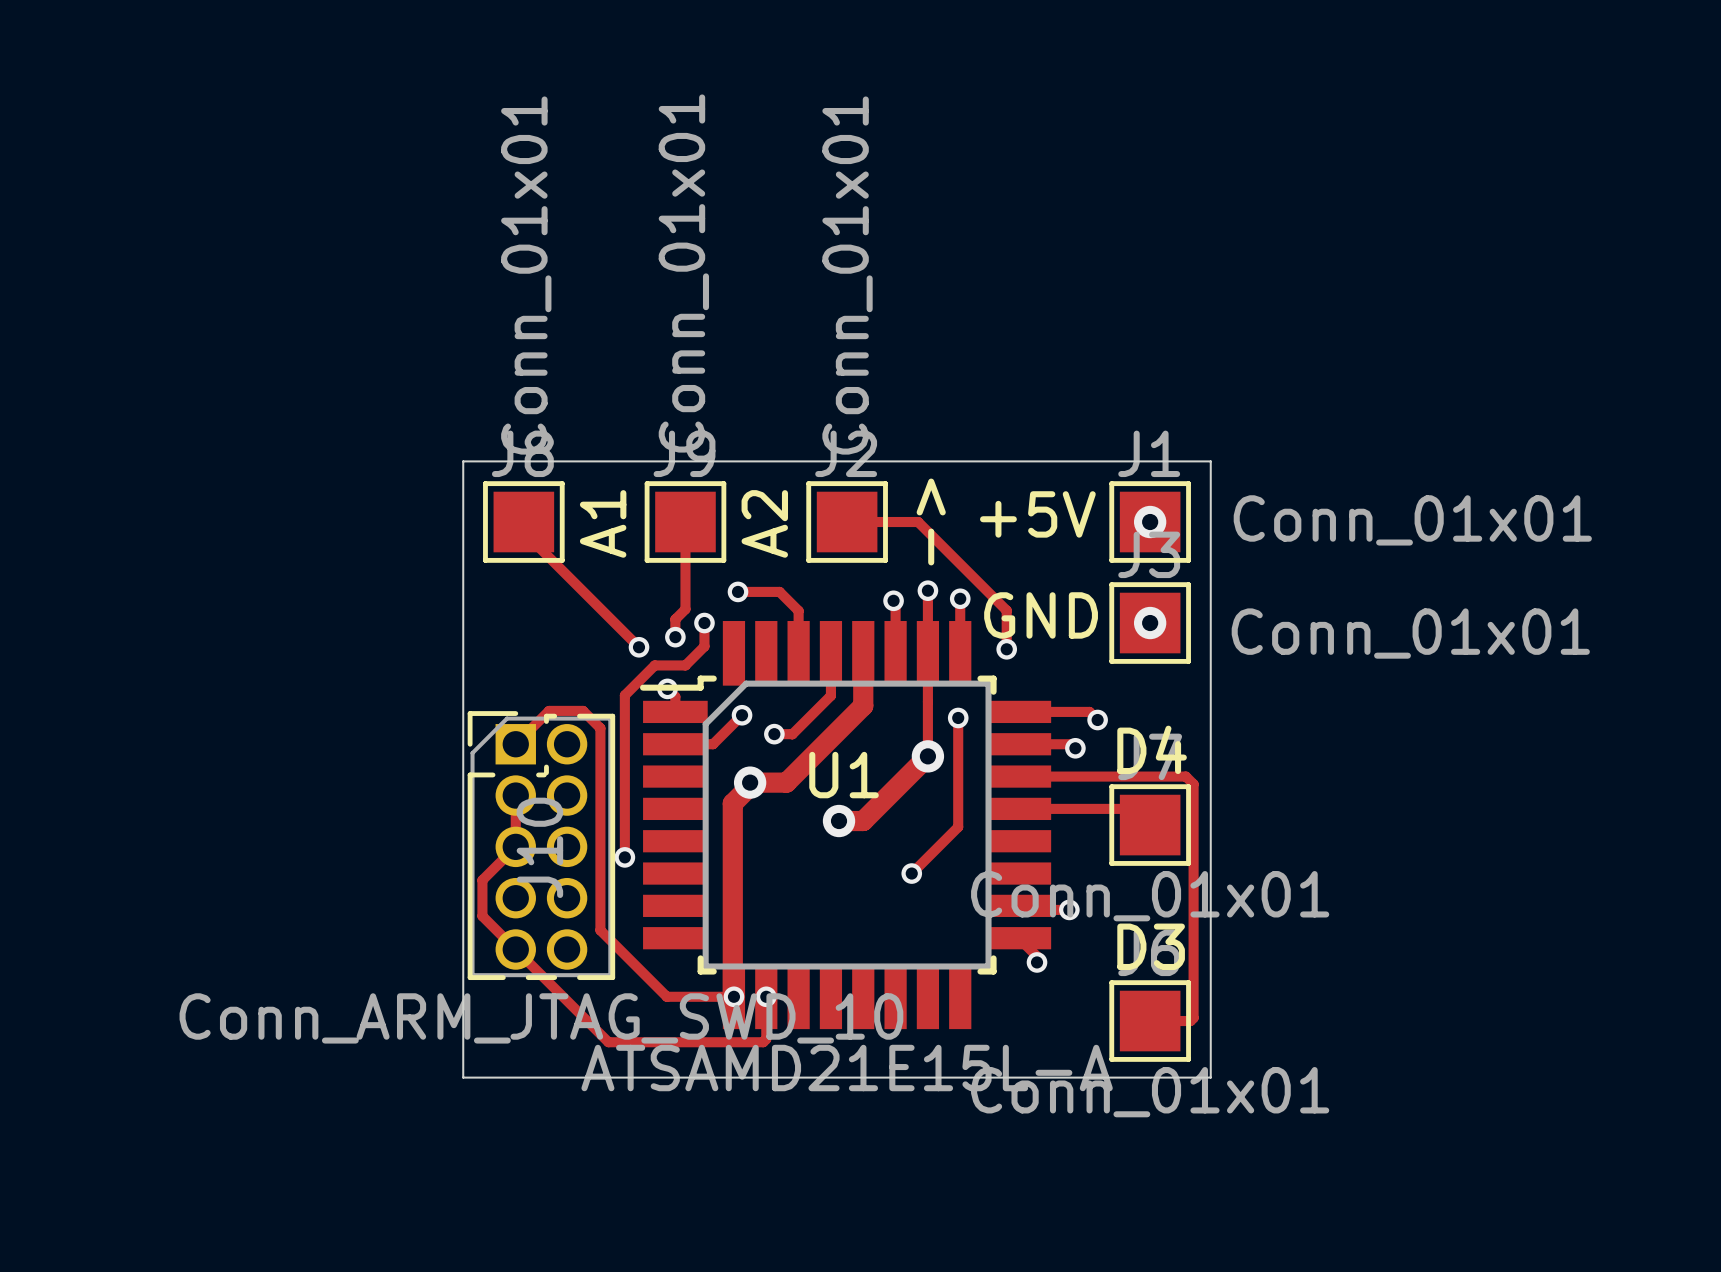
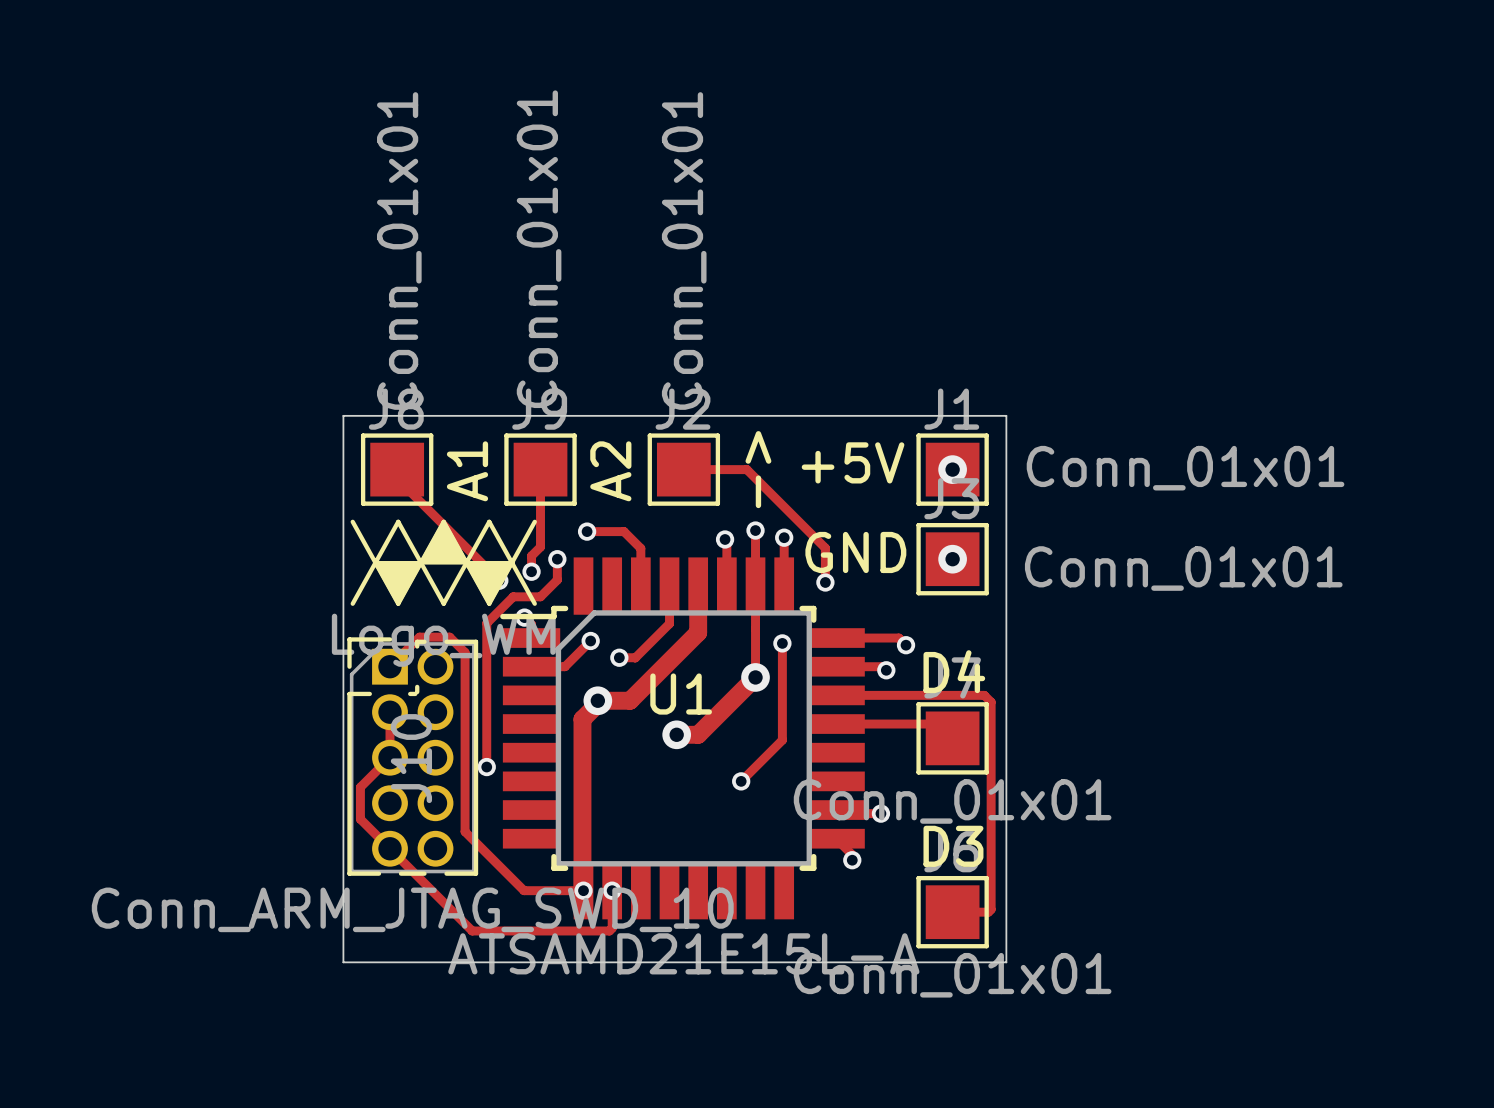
drawing: none -> [350, 519, 537, 606]

